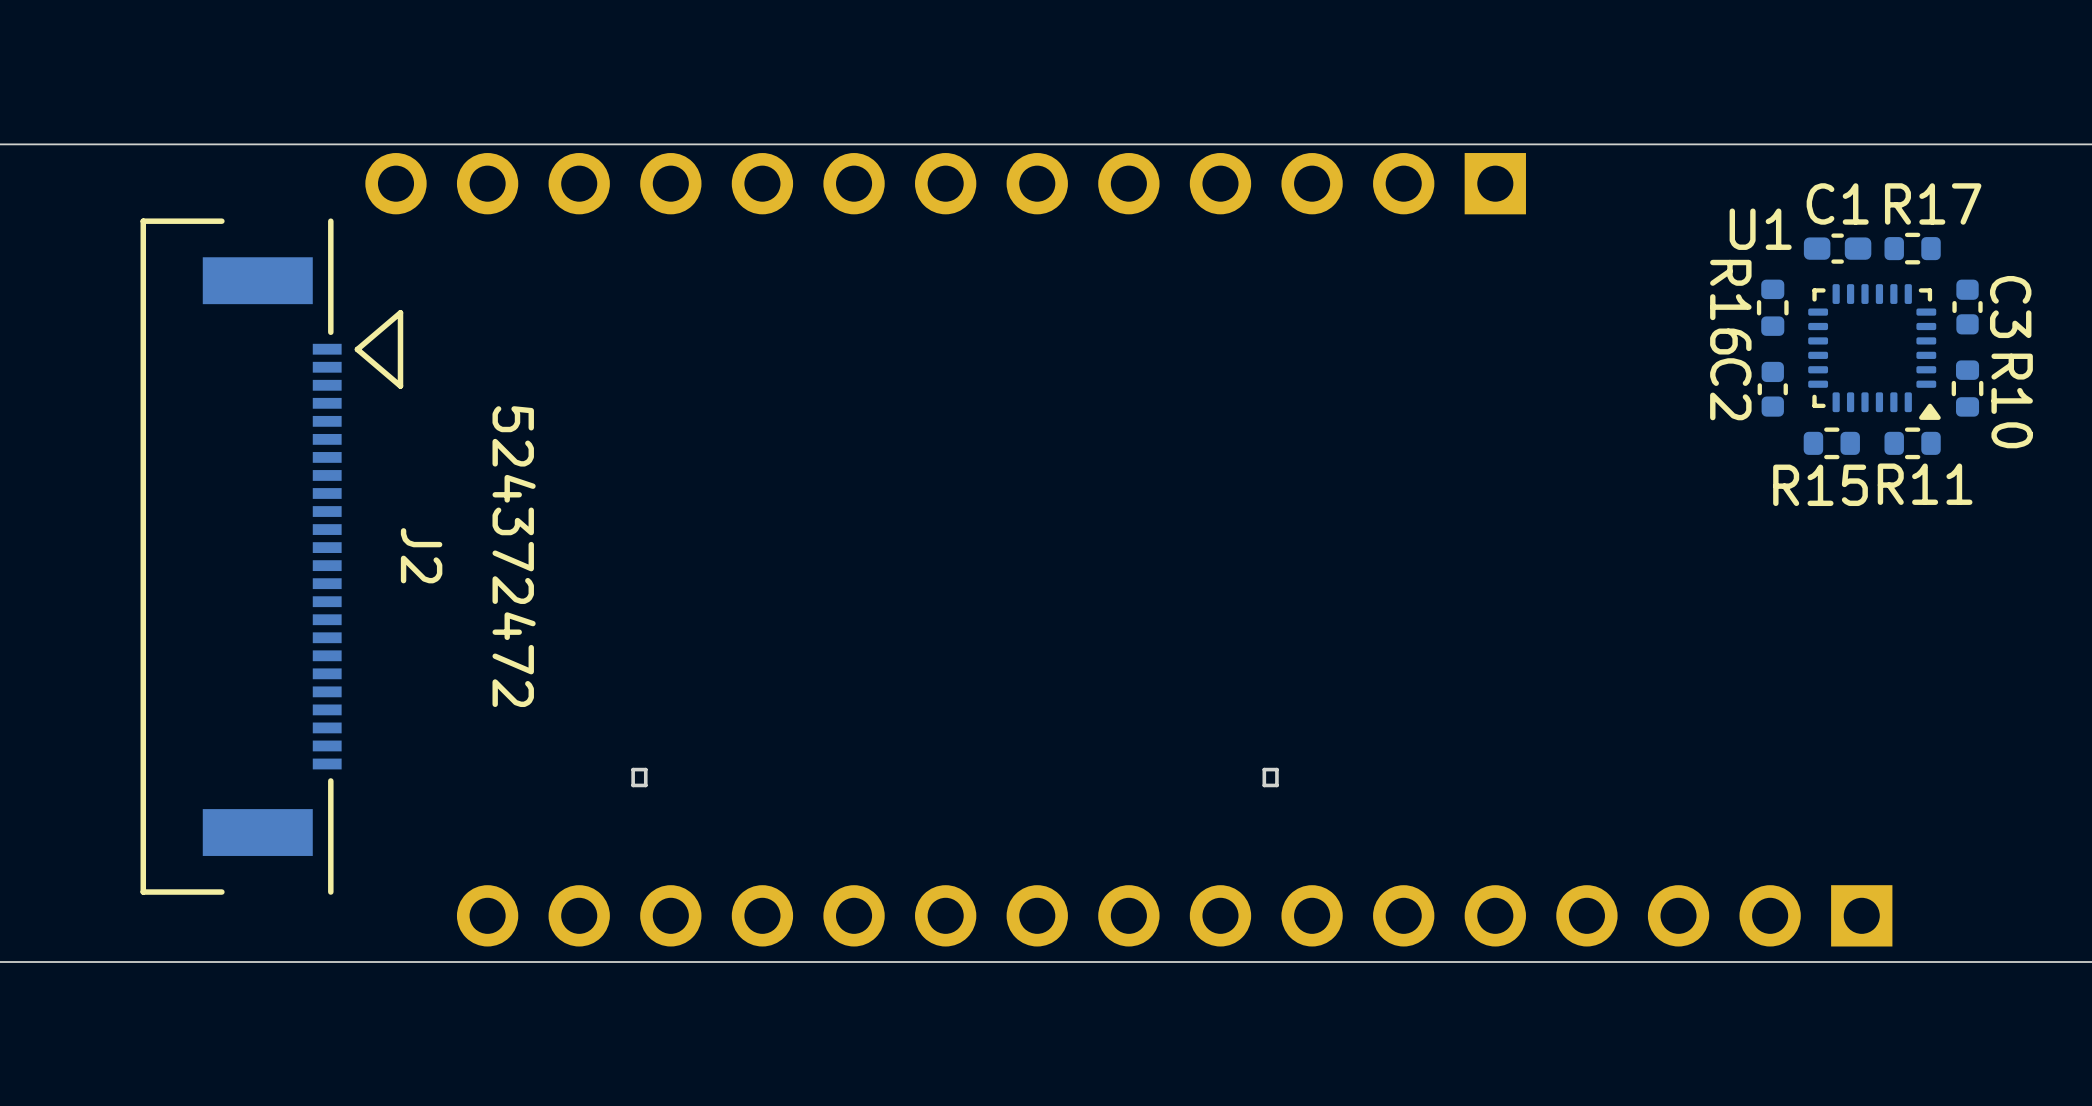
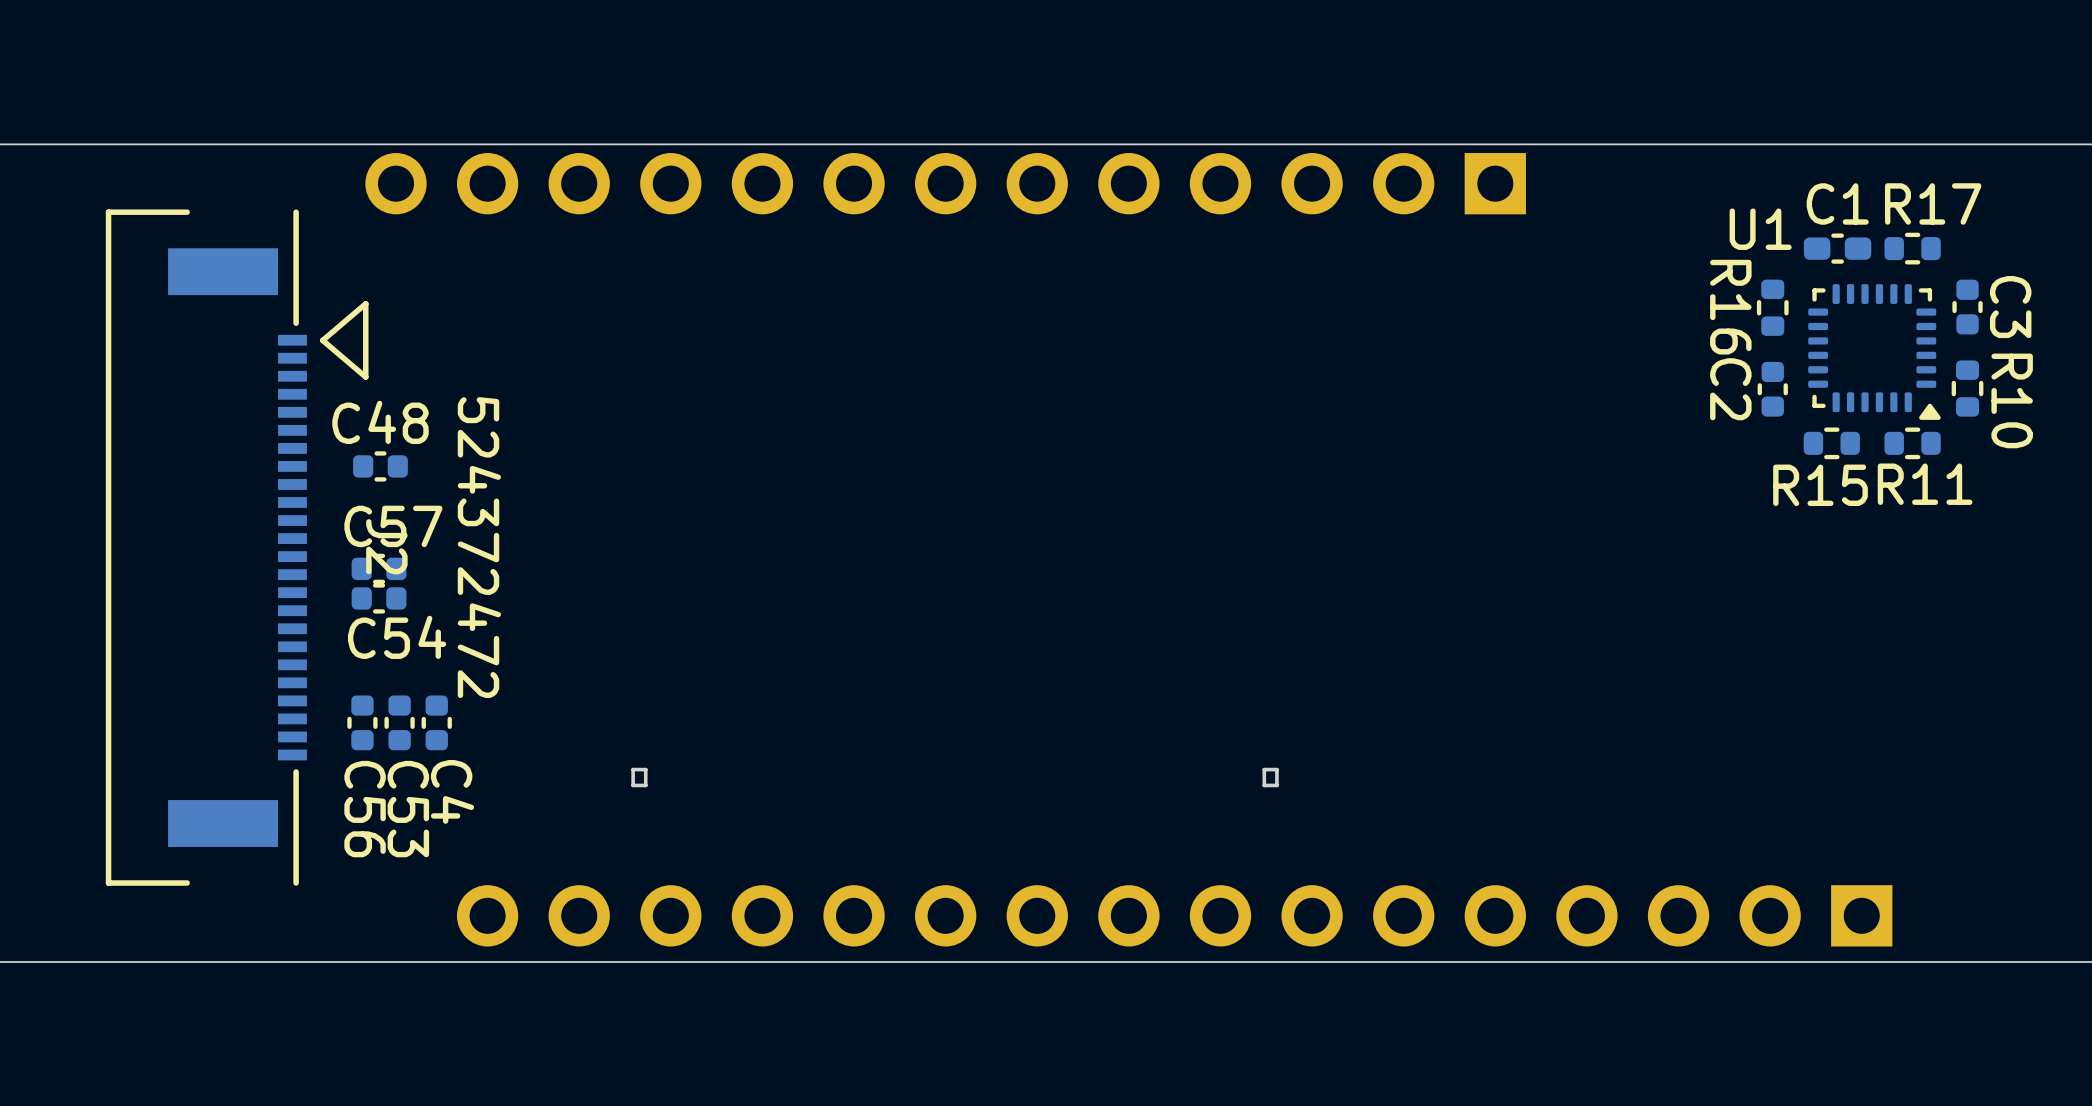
C48: none -> (380, 466)
J2 position: (271, 556) -> (237, 547)
C57: none -> (379, 568)
C54: none -> (379, 598)
C56: none -> (362, 722)
C53: none -> (399, 722)
C4: none -> (436, 722)

